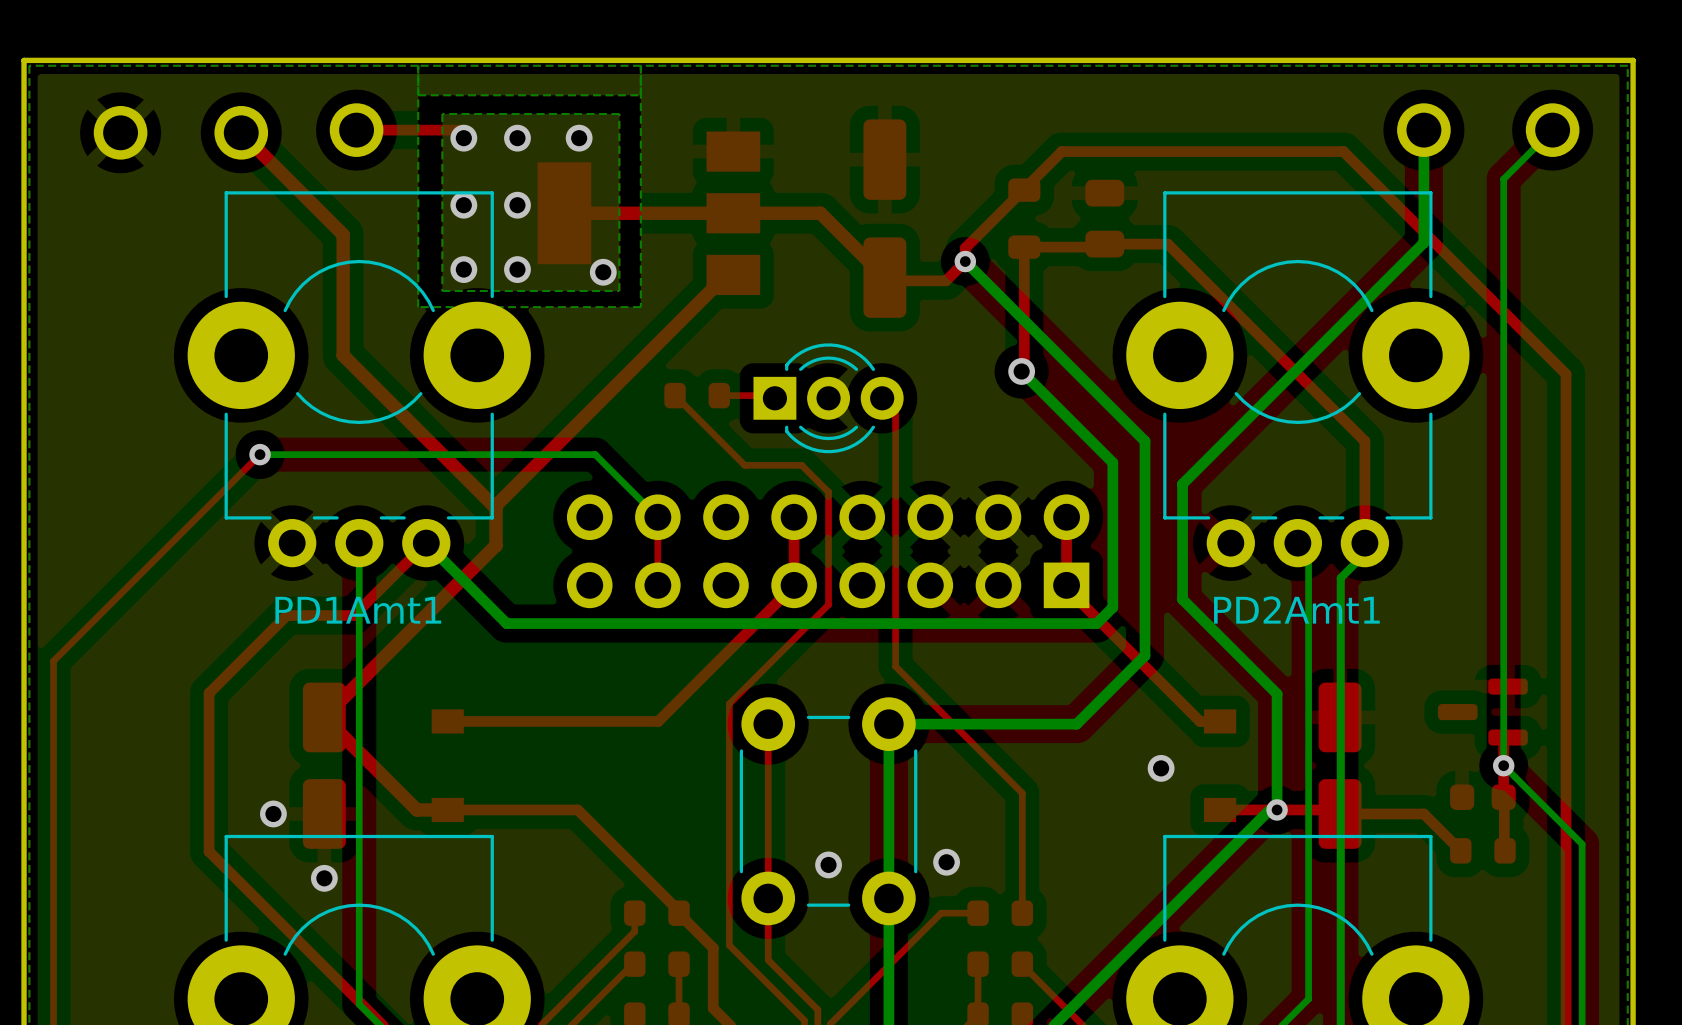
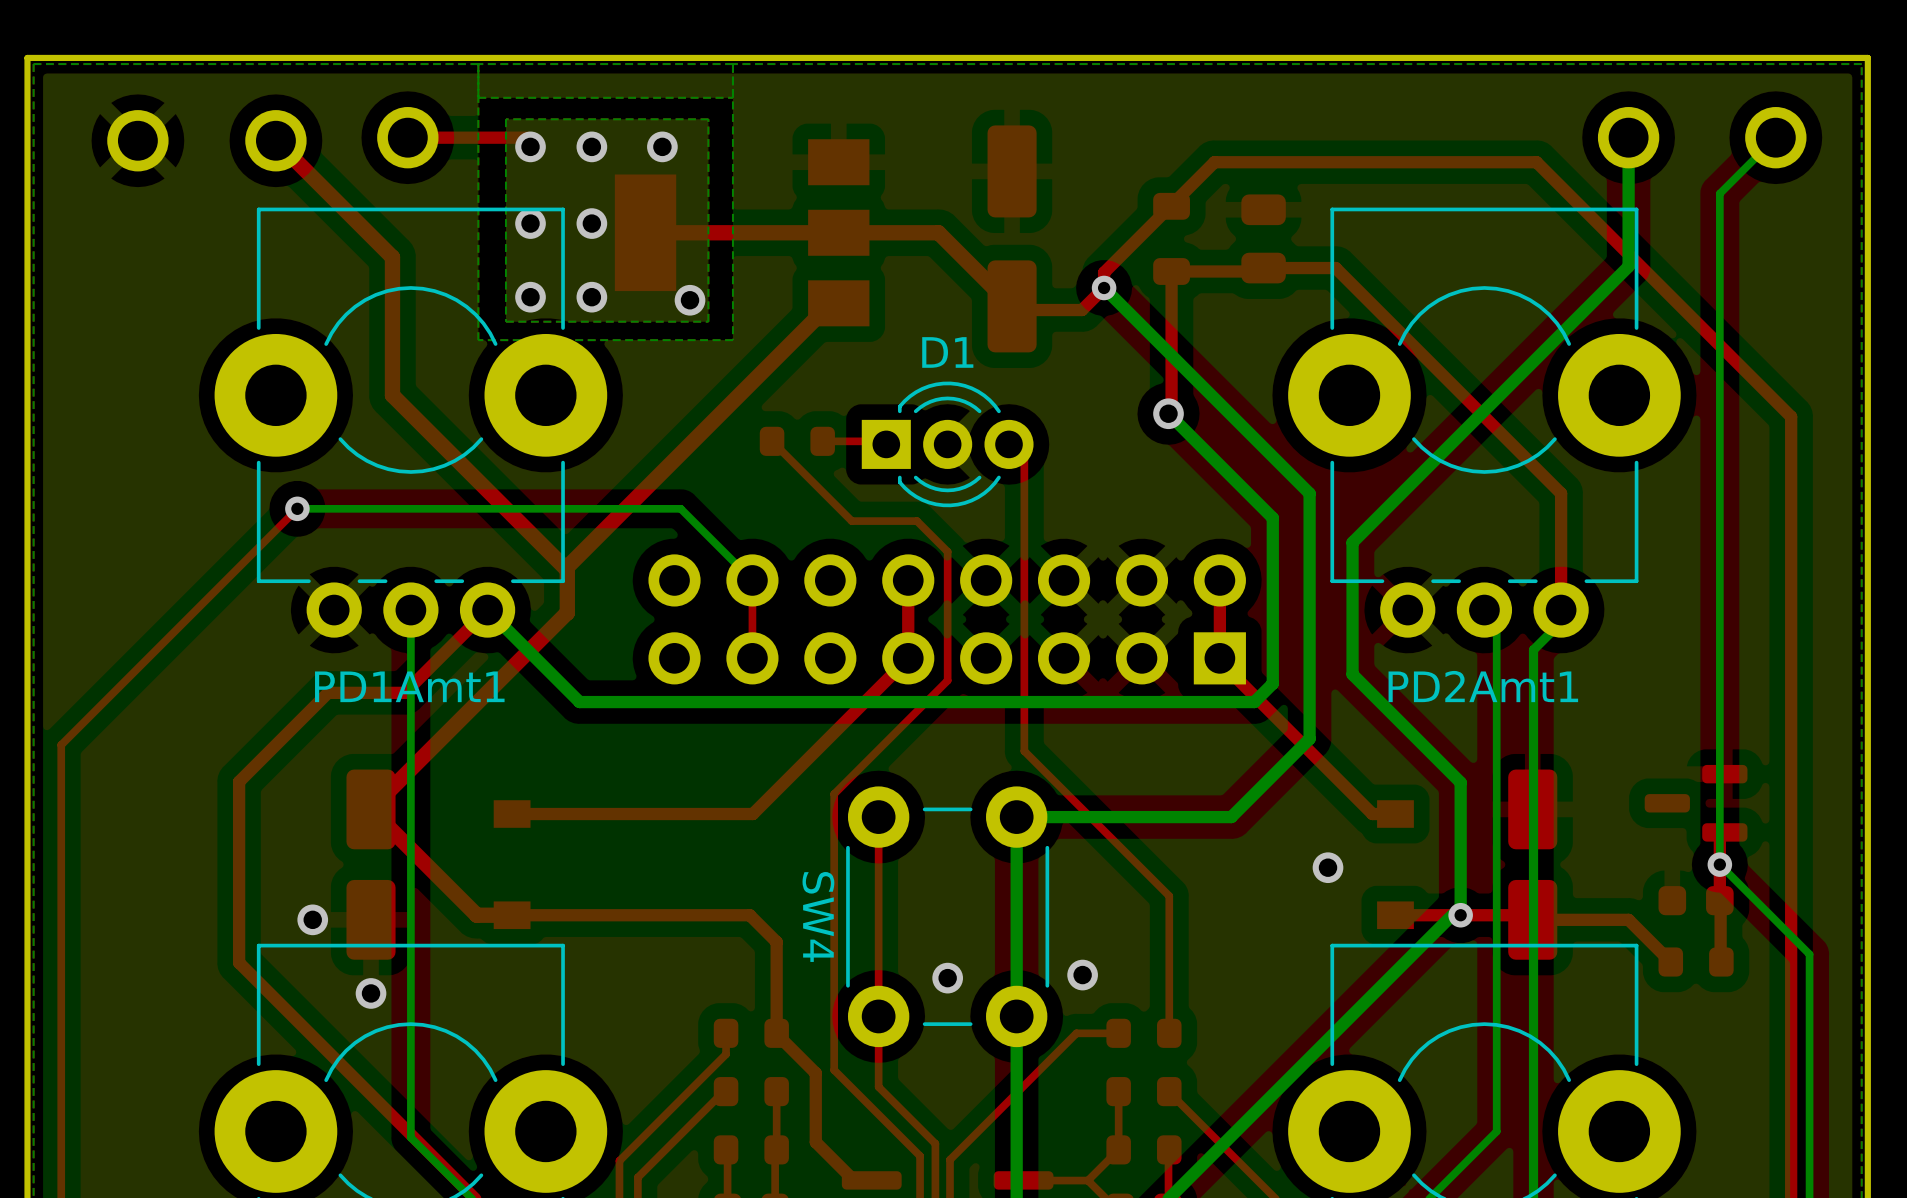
D1 name: none -> D1 (947, 352)
top track: (577, 809) (679, 911) -> (660, 915) (749, 915) (776, 942) (776, 1031)
SW4 name: none -> SW4 (818, 916)

